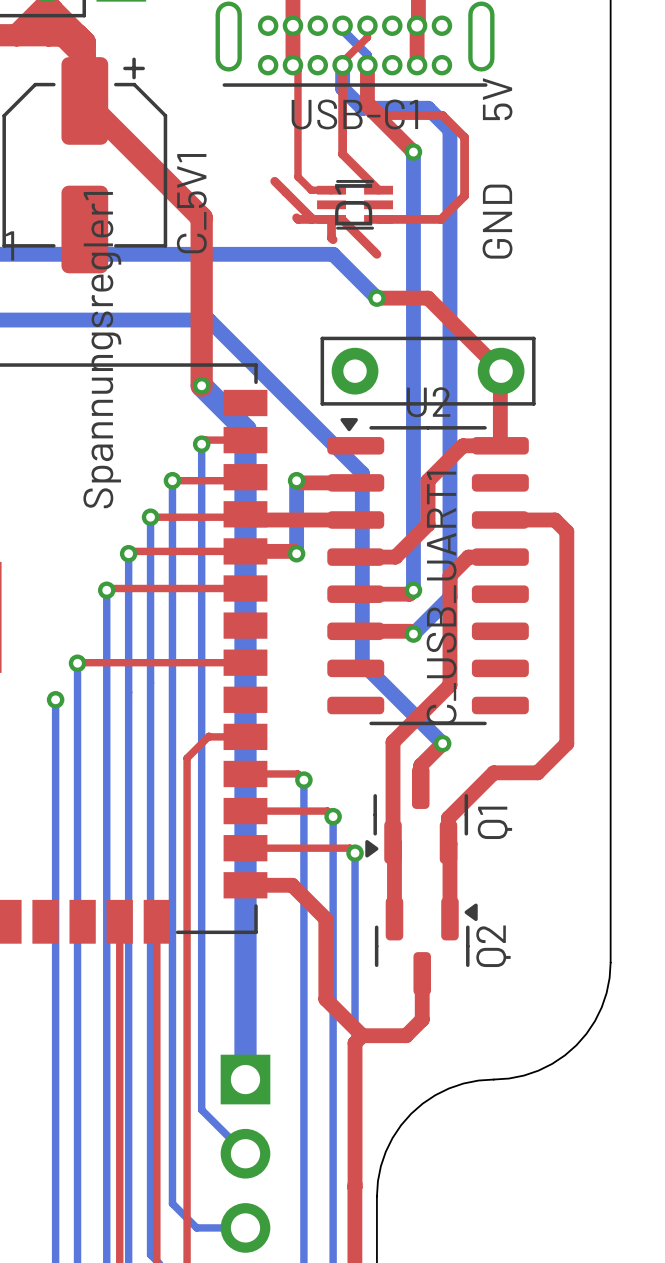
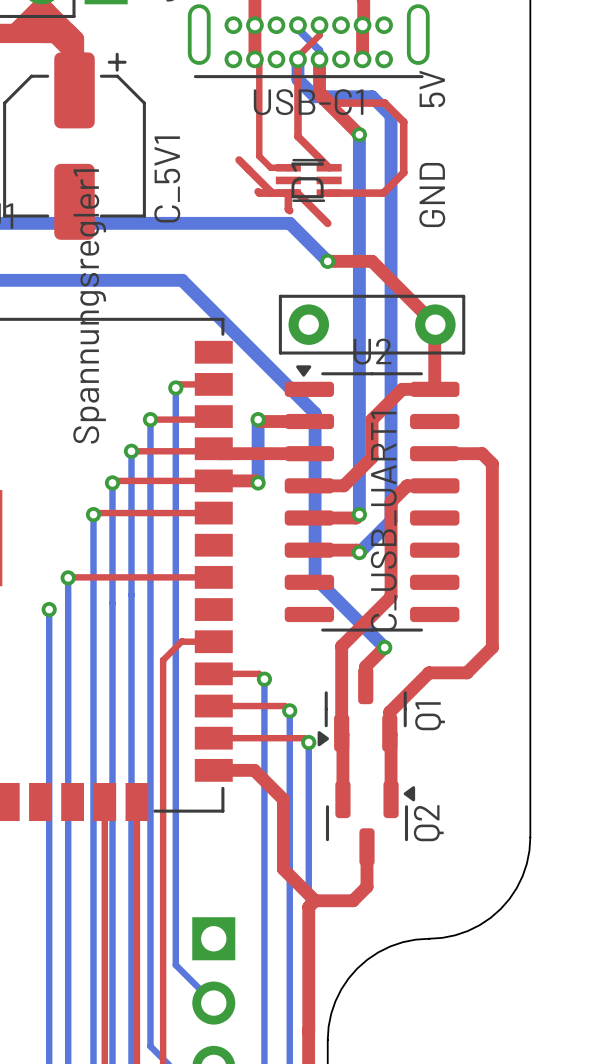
top track: (84, 100) (201, 217) (201, 385) -> none
bottom track: (201, 385) (245, 429) (245, 1079) -> none
via: (201, 385) -> none

